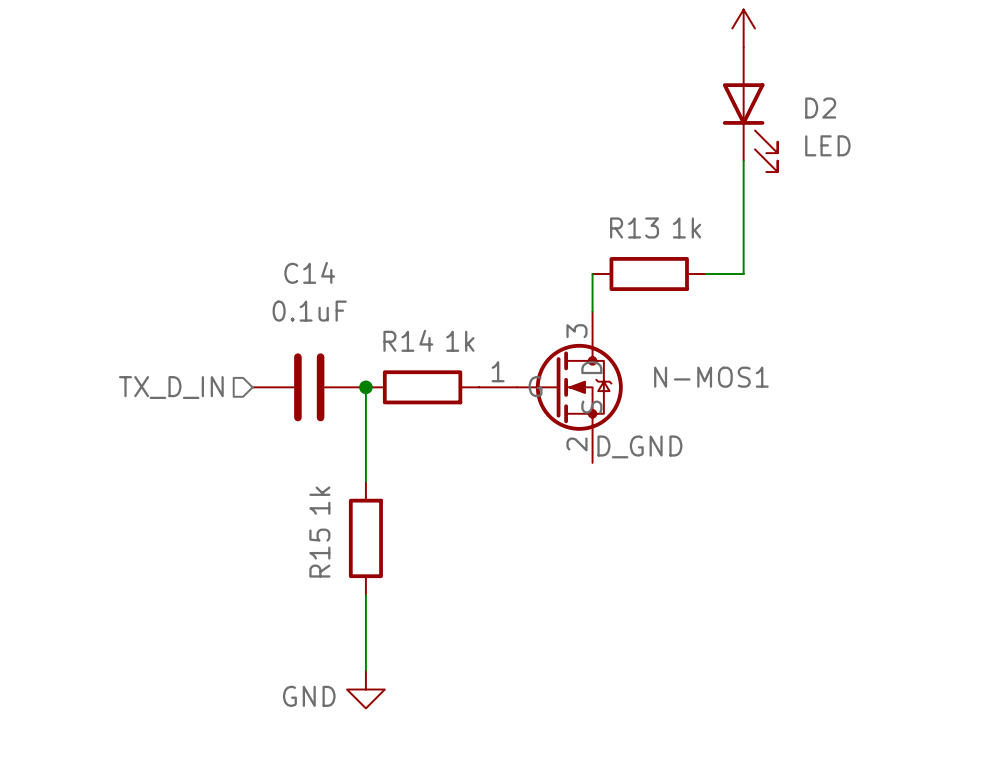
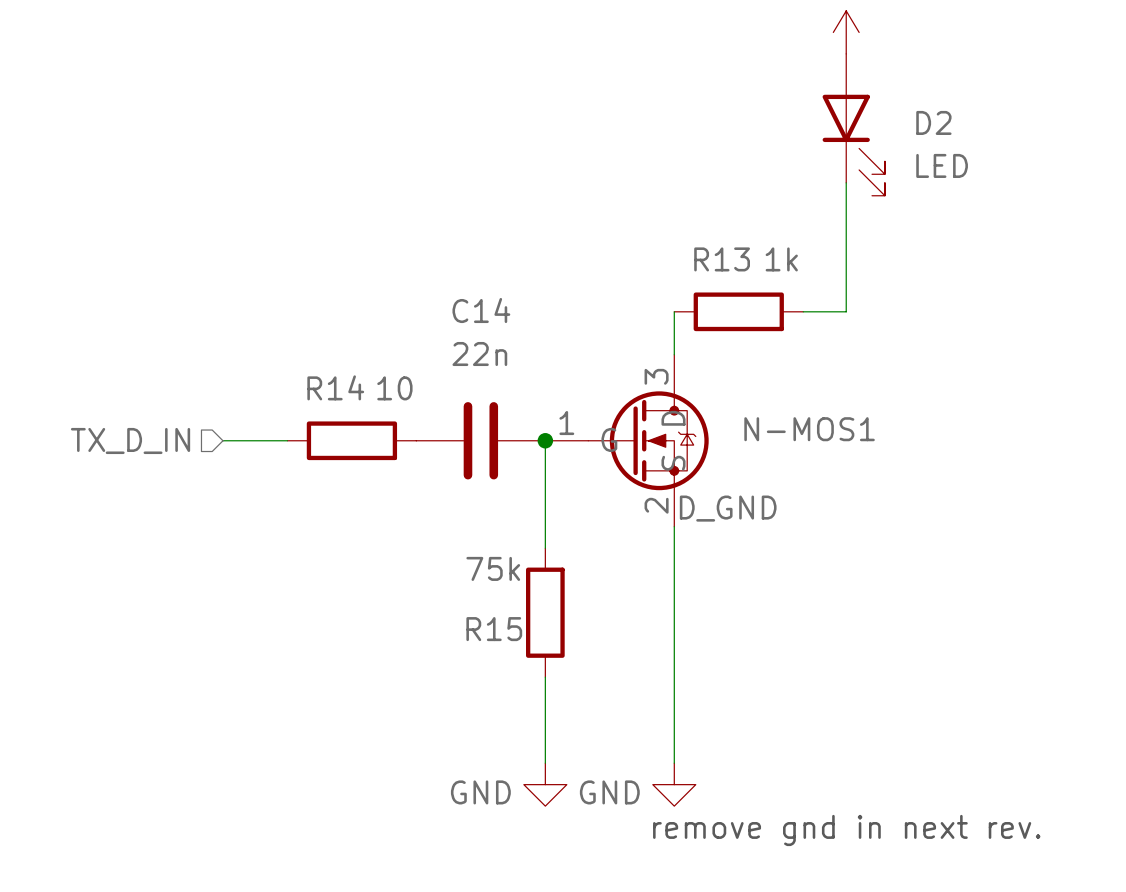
C14 value: 0.1uF (309, 311) -> 22n (479, 353)
R14 value: 1k (460, 341) -> 10 (394, 388)
hierarchical label position: TX_D_IN (171, 387) -> TX_D_IN (130, 440)
wire: none -> (222, 440) (287, 440)
C14 position: (309, 387) -> (480, 440)
wire: (365, 387) (365, 481) -> (545, 440) (545, 548)
junction: (365, 387) -> none
R14 position: (422, 387) -> (351, 440)
junction: none -> (545, 440)
wire: none -> (674, 526) (674, 763)
R15 value: 1k (319, 500) -> 75k (493, 568)
R15 position: (365, 538) -> (545, 612)
R15 name rotation: 0° (319, 553) -> 90° clockwise (494, 629)
wire: (365, 595) (365, 670) -> (545, 677) (545, 763)
power symbol: GND (365, 689) -> none
power symbol: none -> GND (545, 784)
power symbol: none -> GND (674, 784)
text: none -> remove gnd in next rev. (846, 830)

